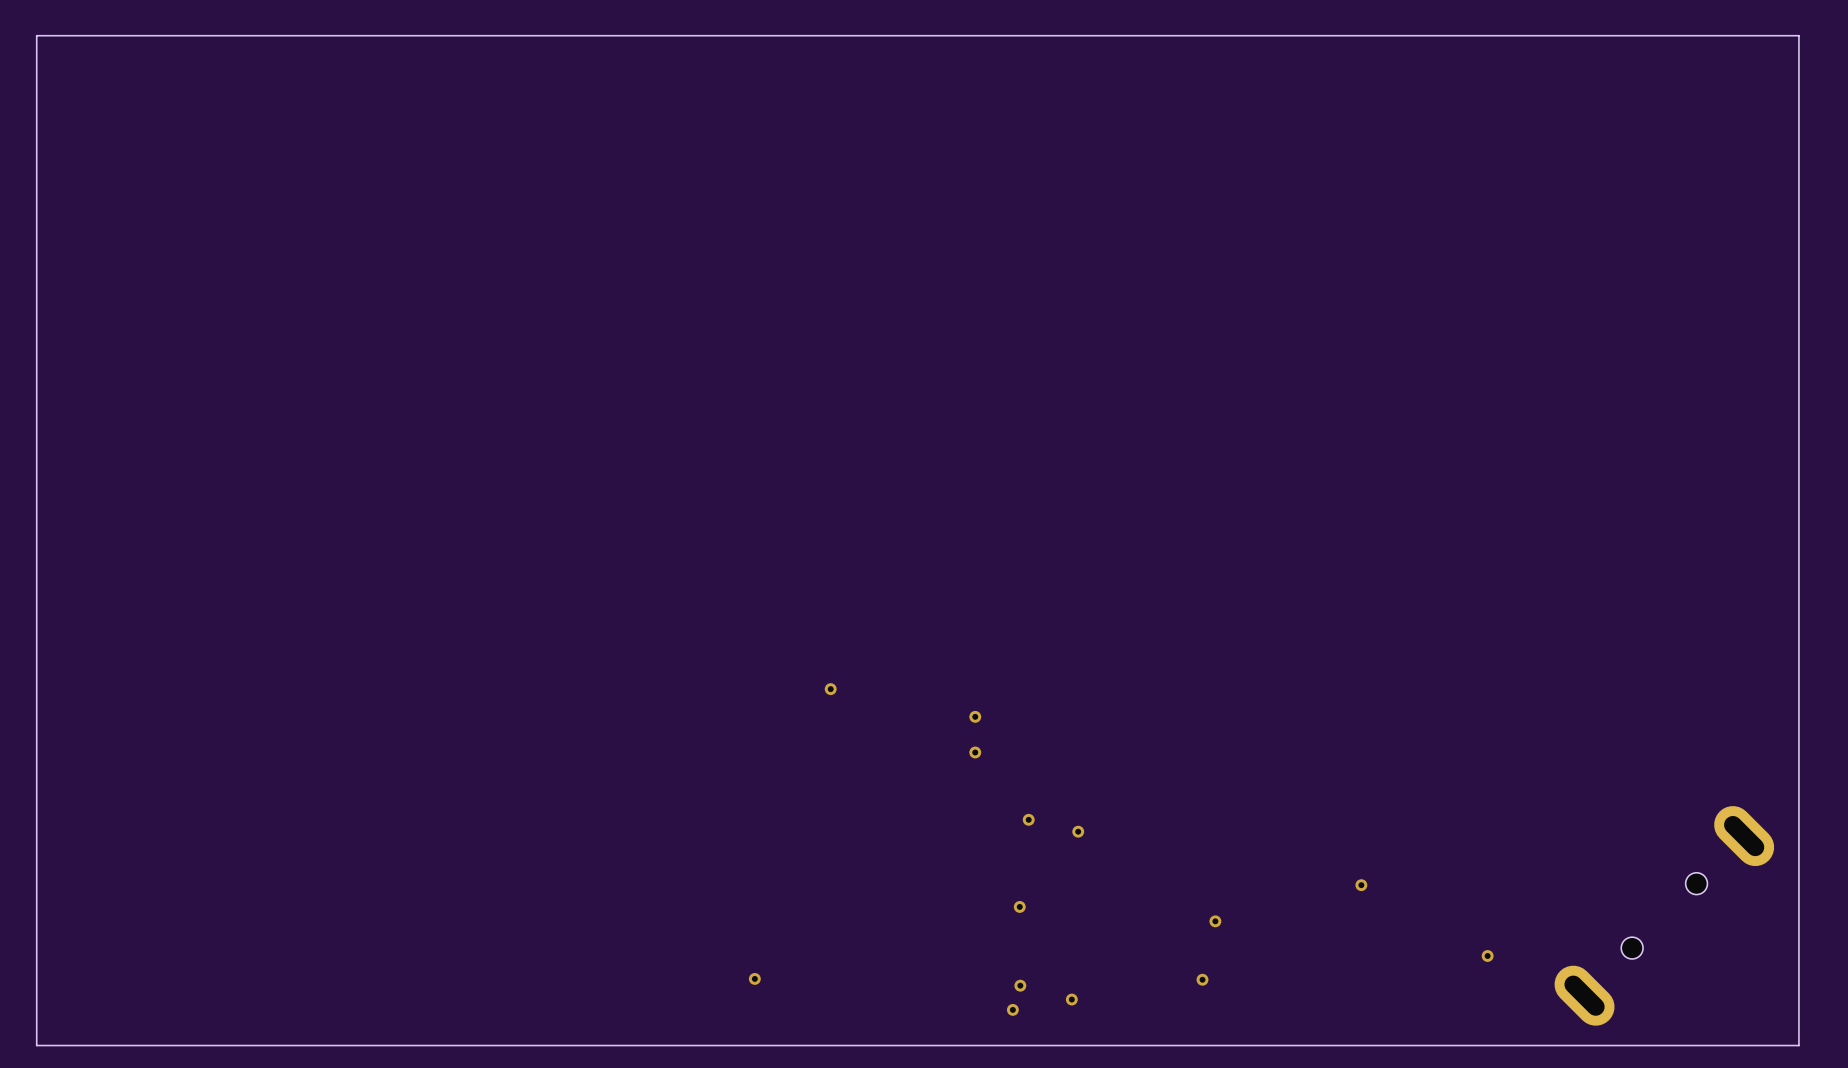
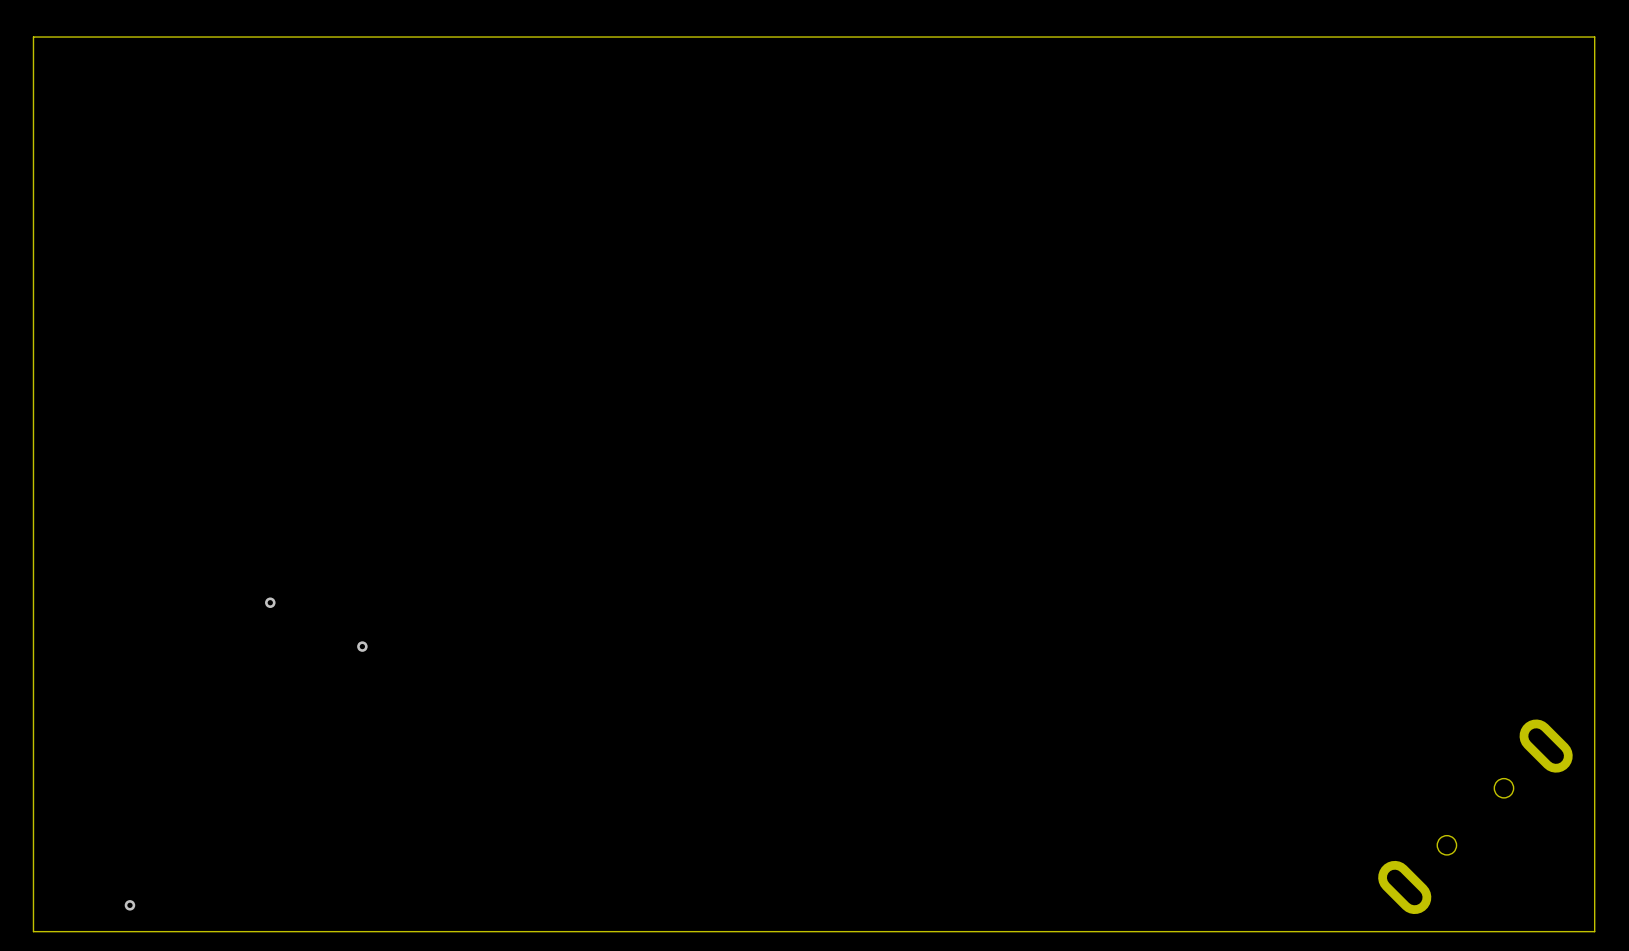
via: none -> (270, 602)
via: (830, 689) -> none
via: (975, 716) -> none
via: none -> (362, 646)
via: (975, 752) -> none
via: (1028, 819) -> none
via: (1078, 831) -> none
via: (1361, 885) -> none
via: (1019, 906) -> none
via: (1215, 921) -> none
via: (1487, 955) -> none
via: (754, 978) -> none
via: (1202, 979) -> none
via: (1020, 985) -> none
via: (1071, 999) -> none
via: (1012, 1009) -> none
via: none -> (129, 905)

